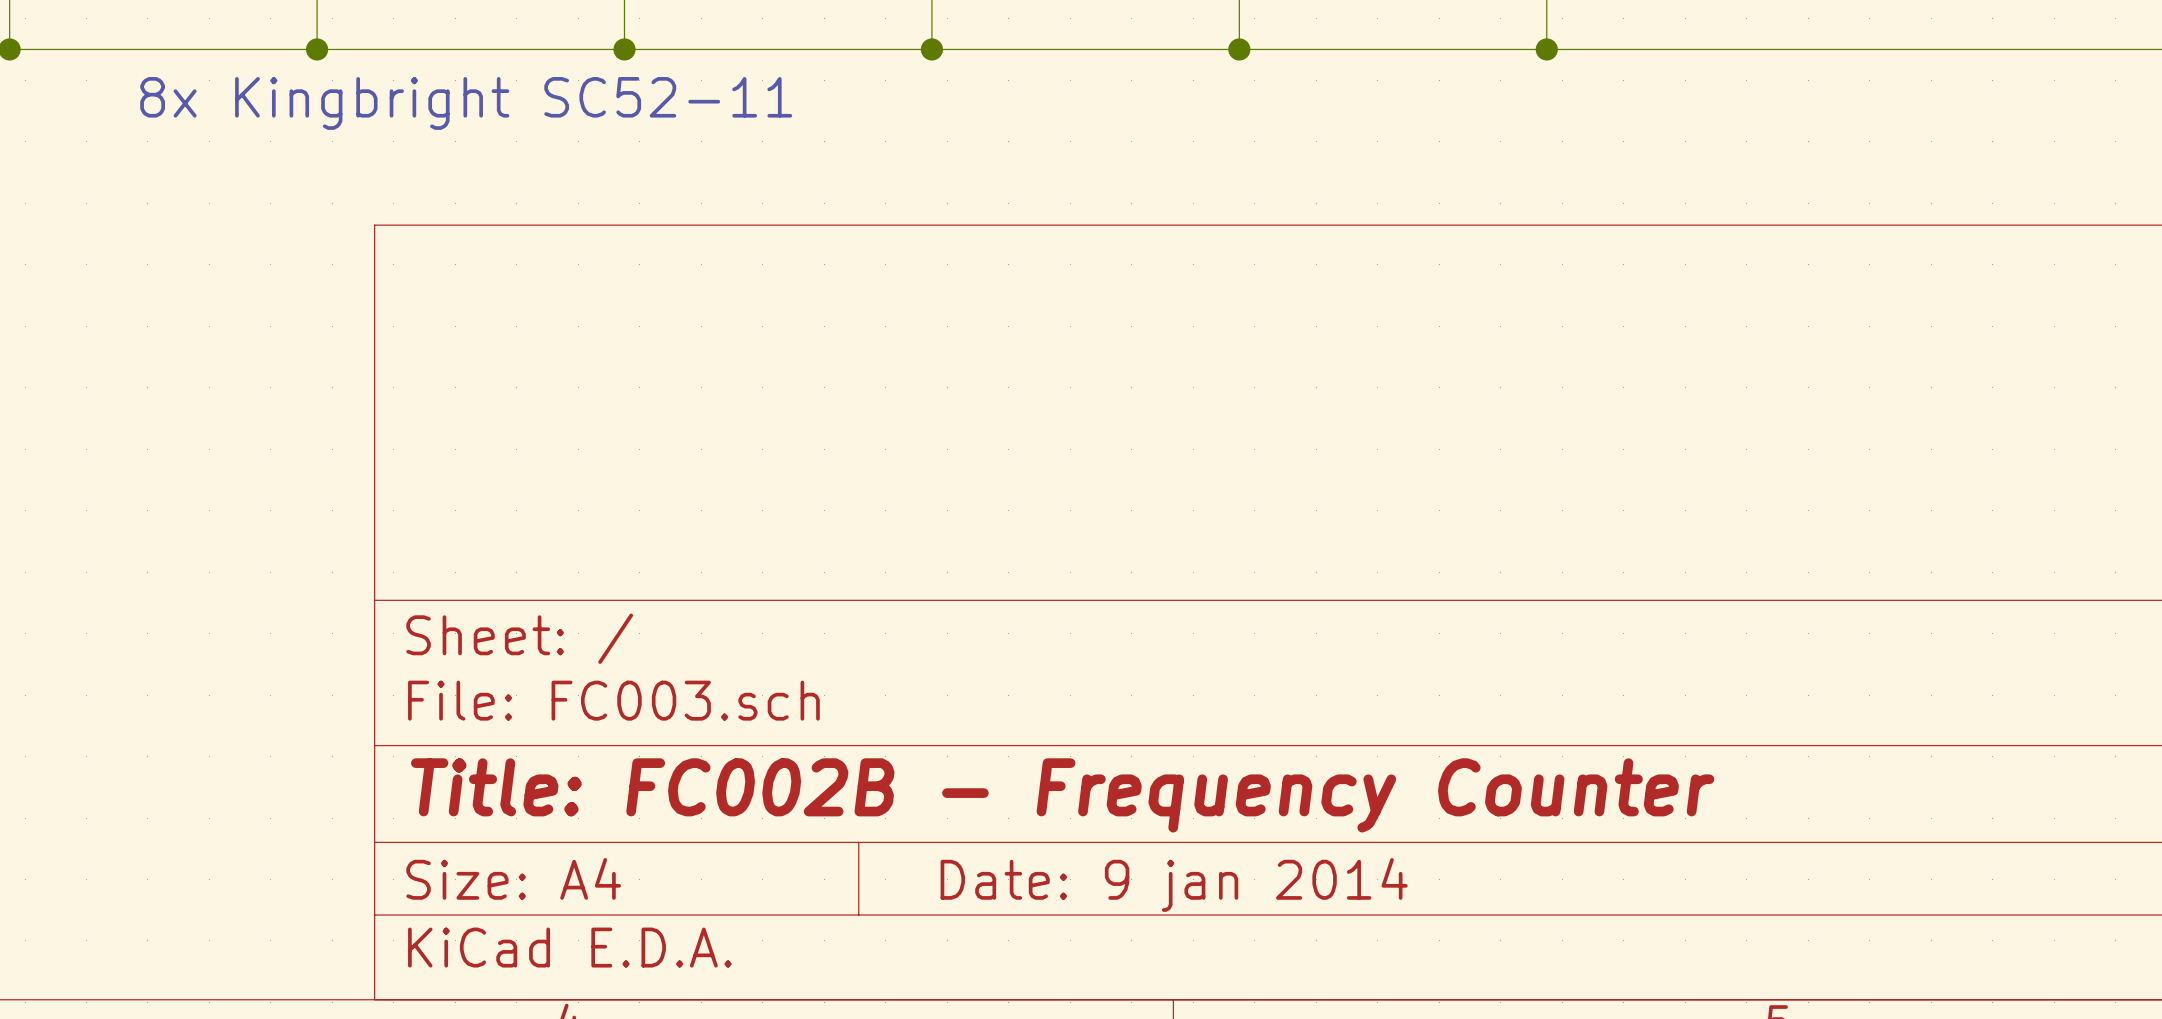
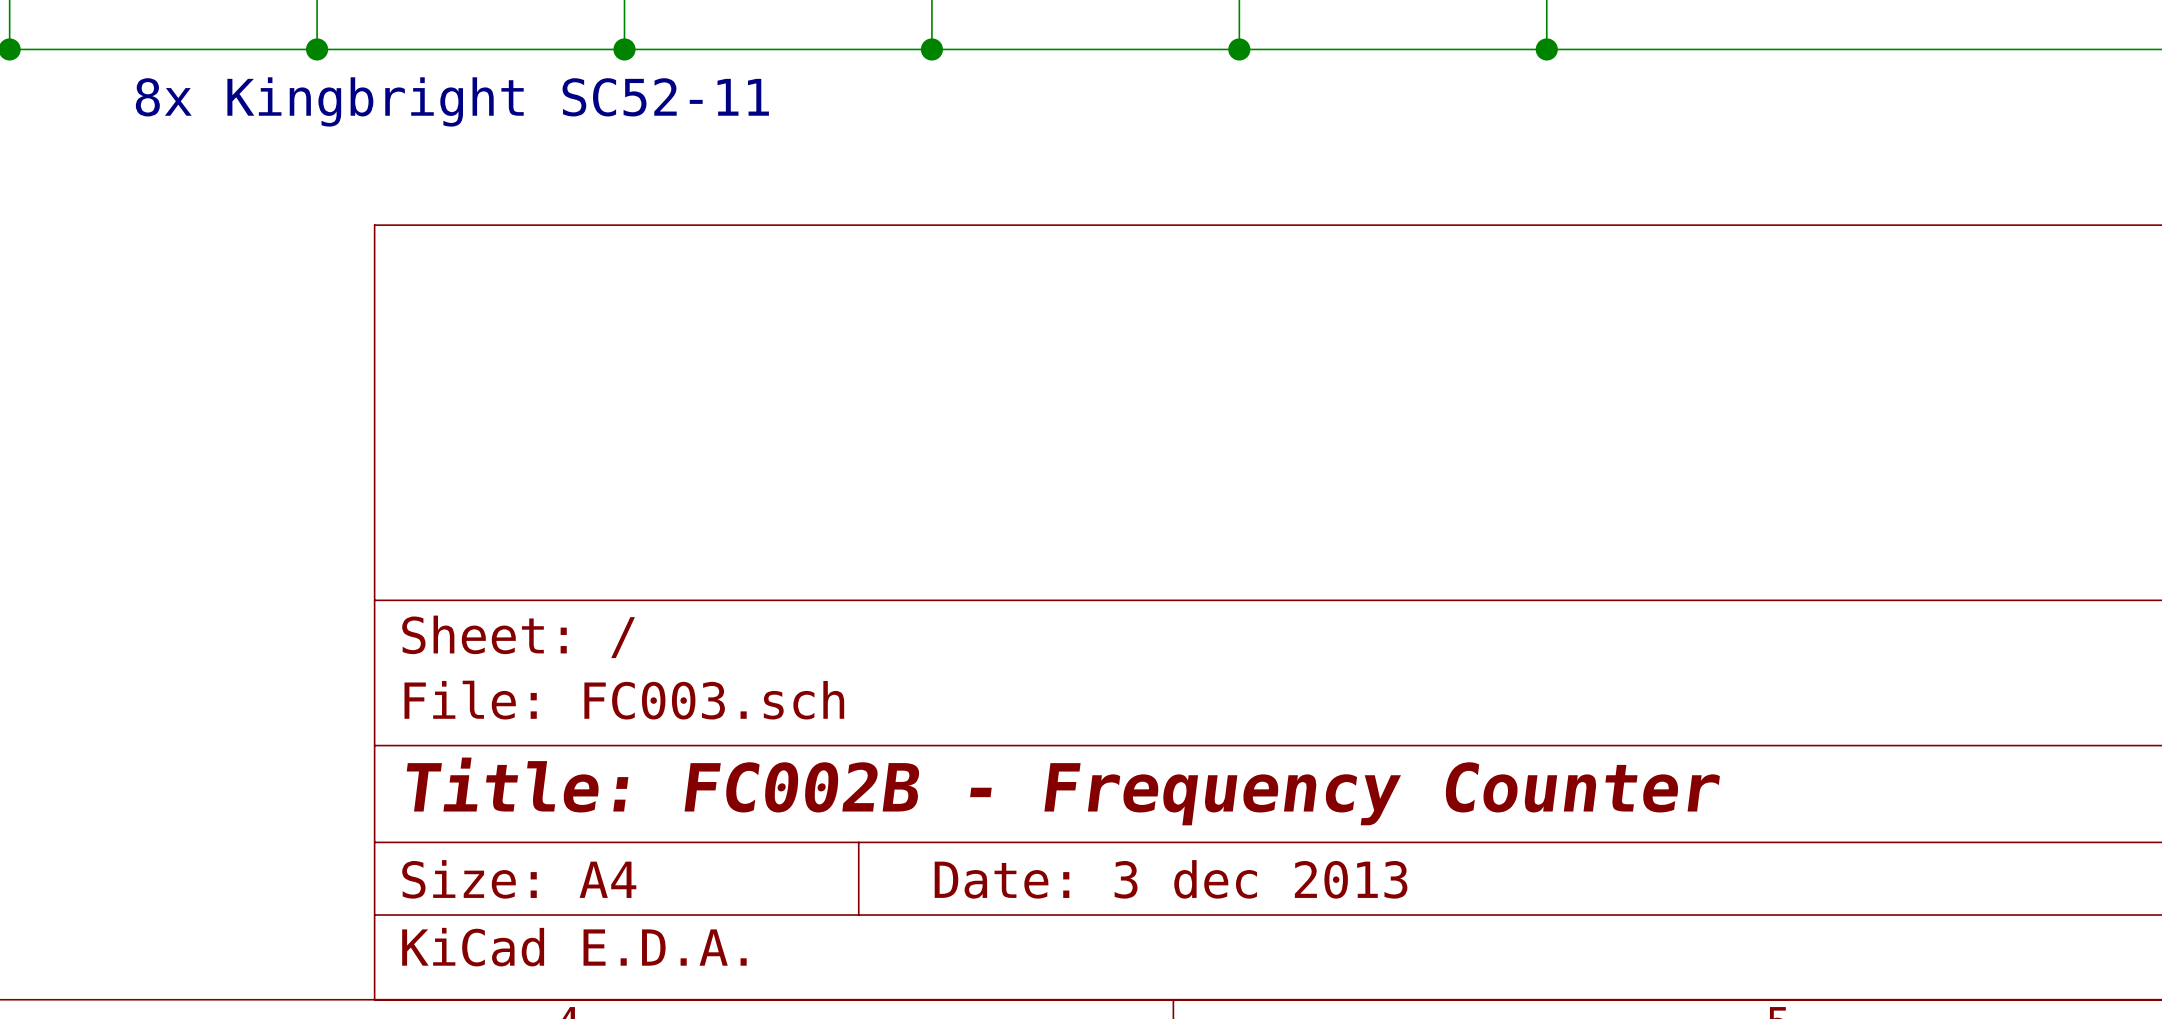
title block: Date: 9 jan 2014 (1174, 884) -> Date: 3 dec 2013 (1171, 879)

